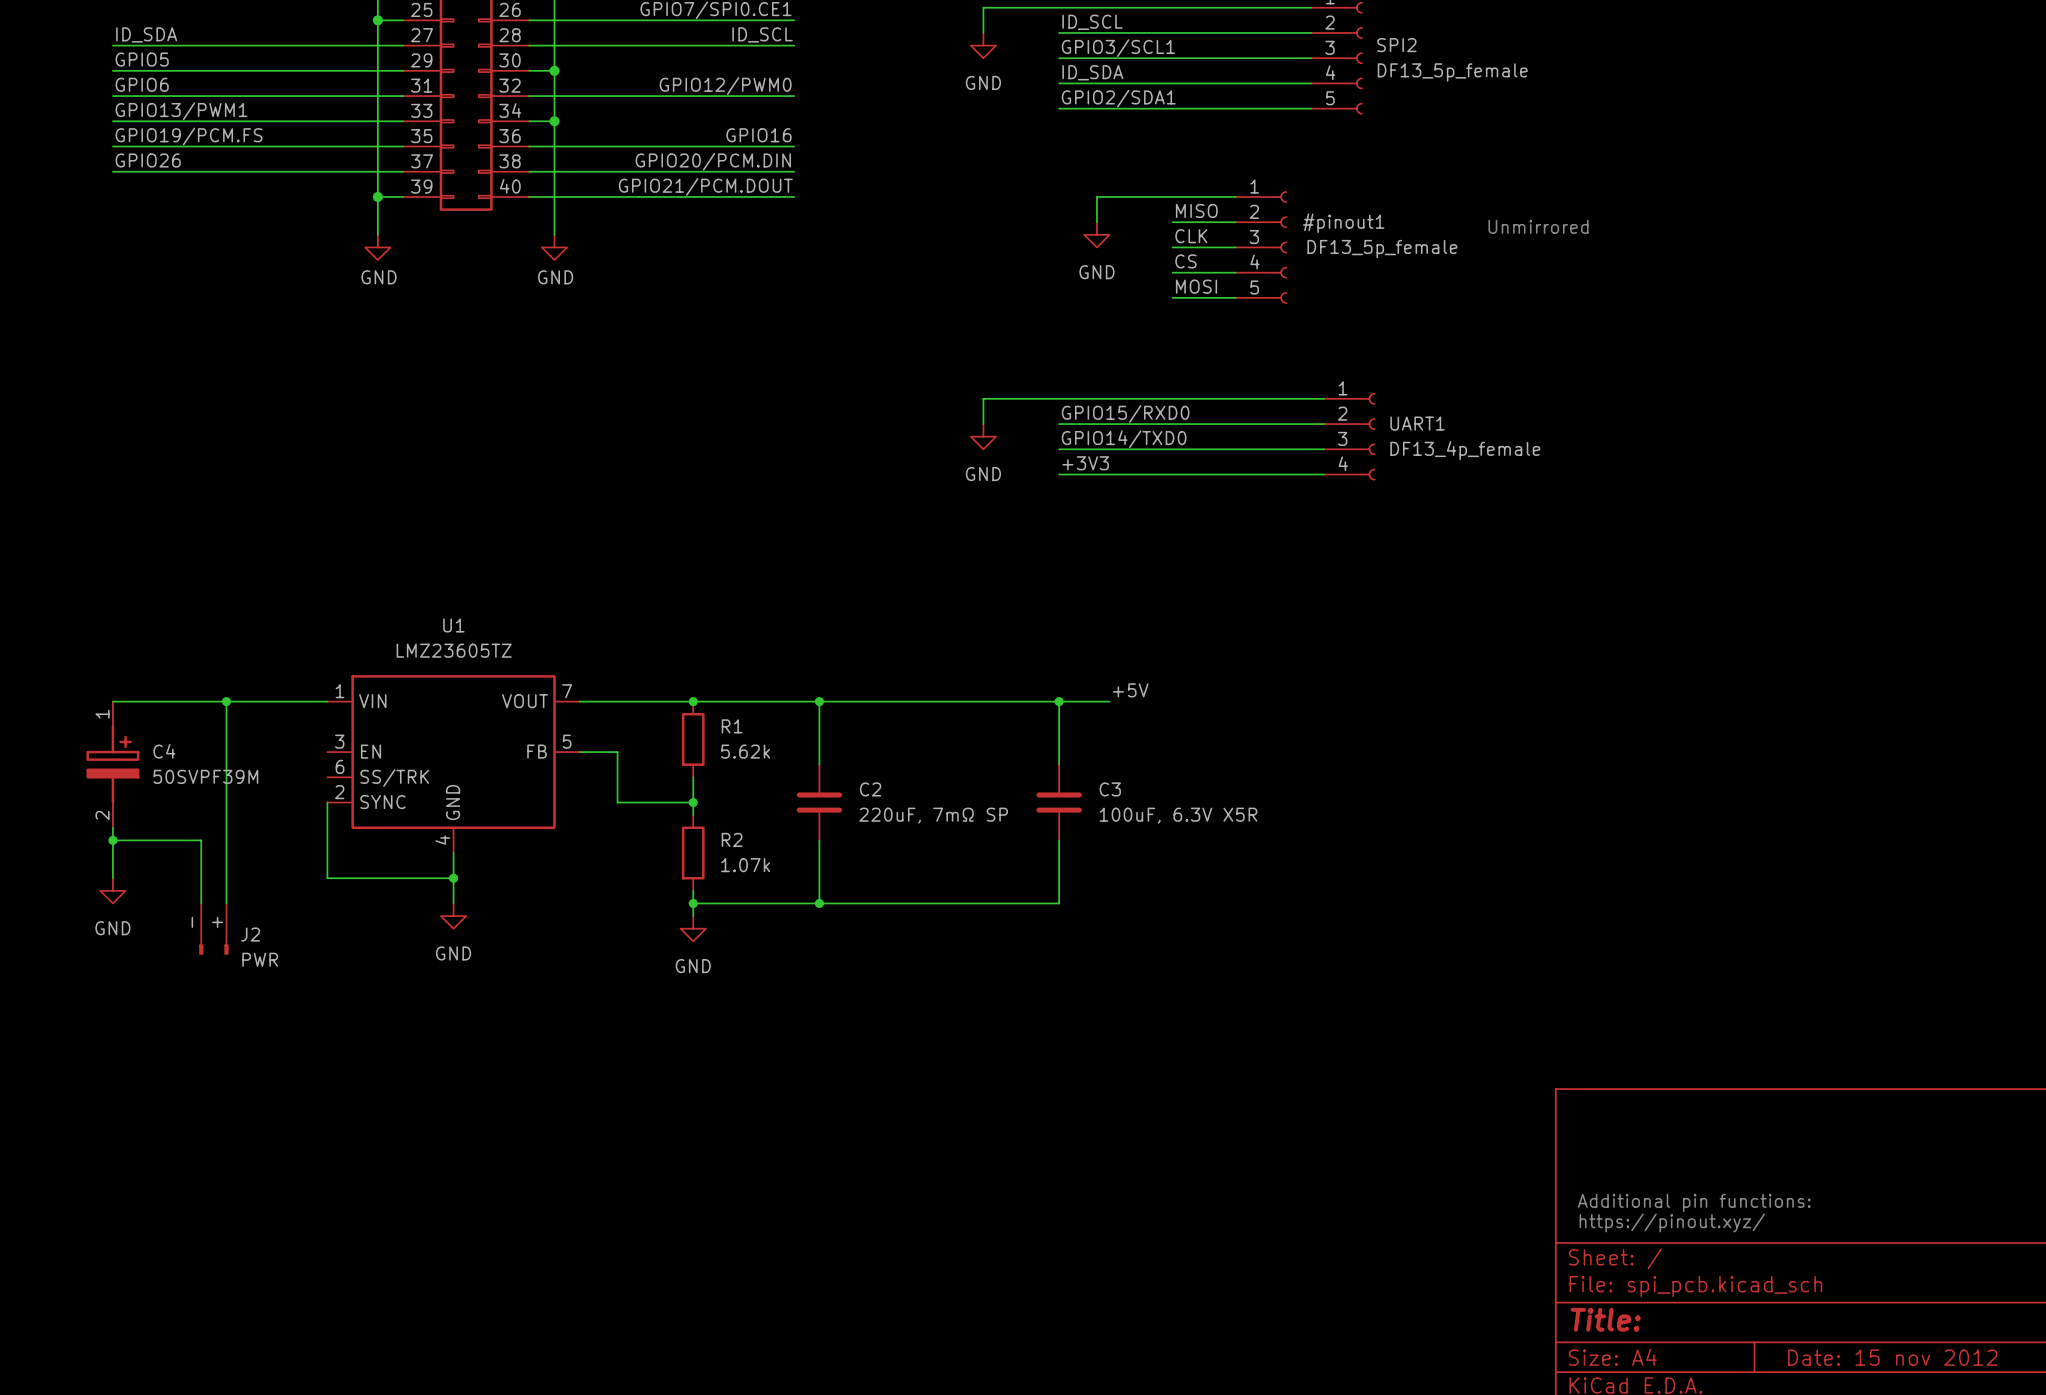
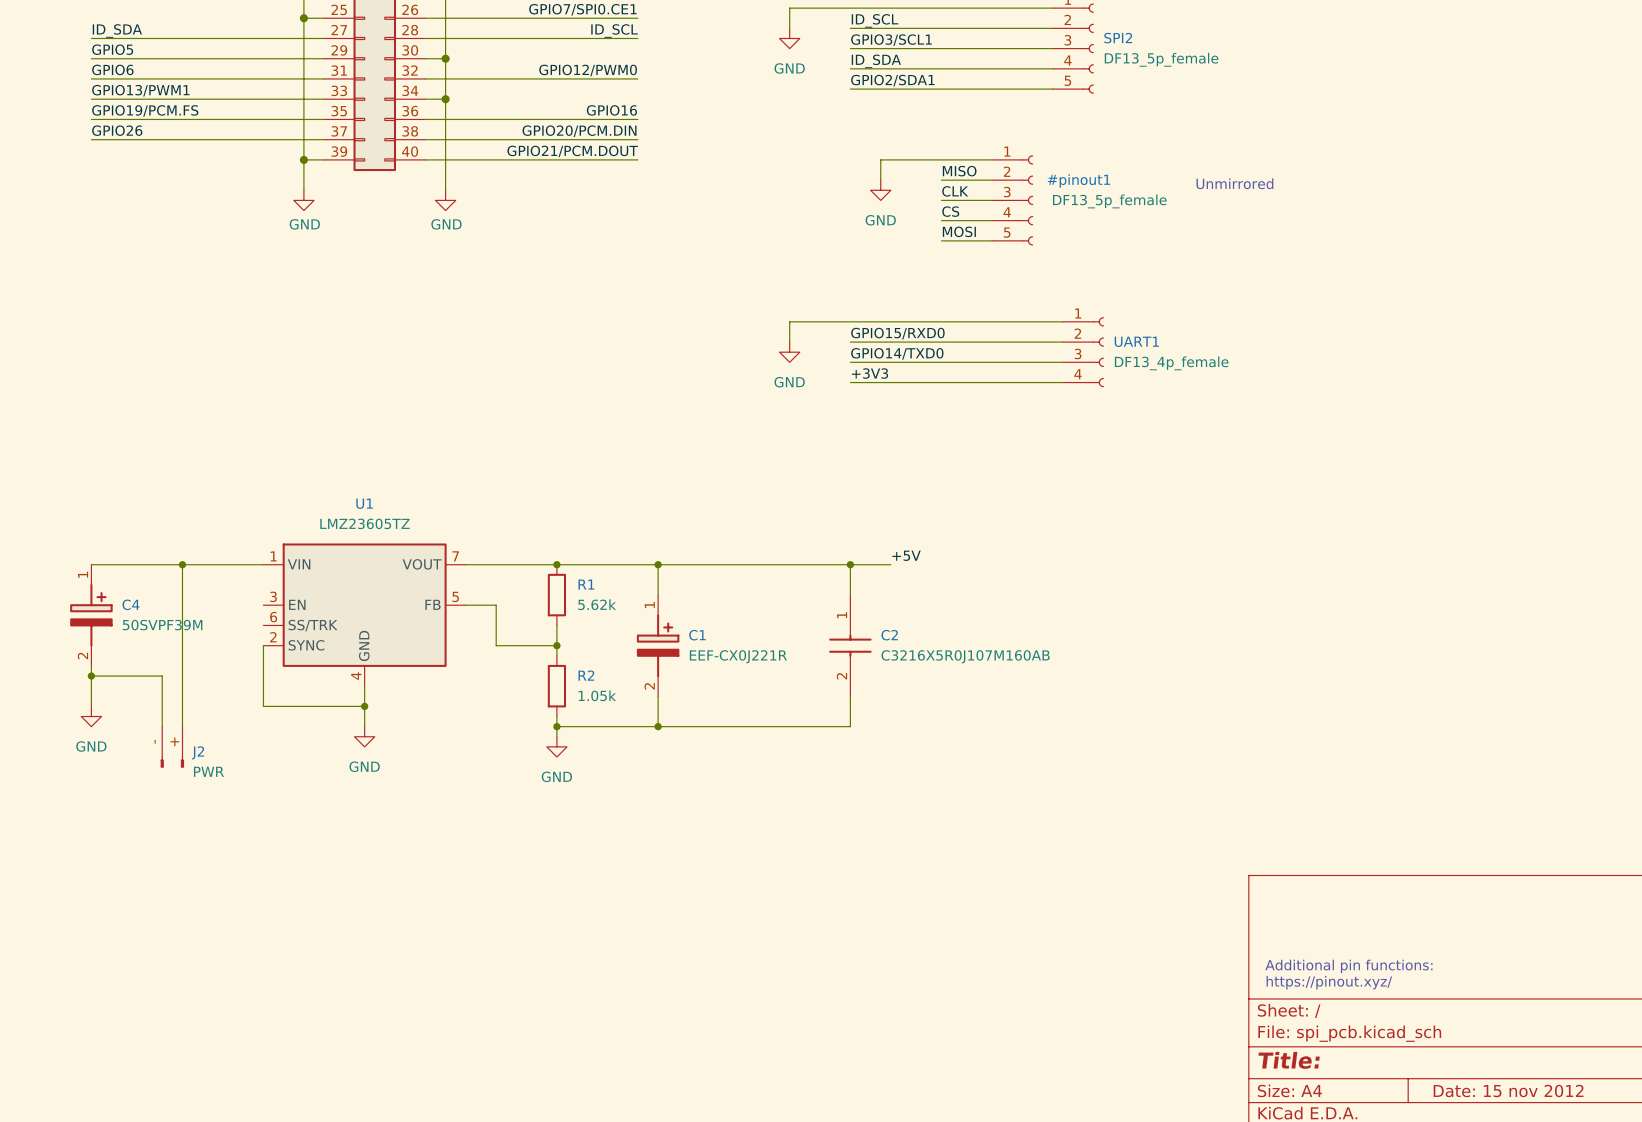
C2 symbol: [796, 764, 843, 841] -> [829, 595, 872, 697]
C1: none -> EEF-CX0J221R (658, 645)
C3: 100uF, 6.3V X5R (1059, 802) -> none
C2 value: 220uF, 7mΩ SP (933, 815) -> C3216X5R0J107M160AB (965, 656)
R2 value: 1.07k (745, 865) -> 1.05k (597, 695)

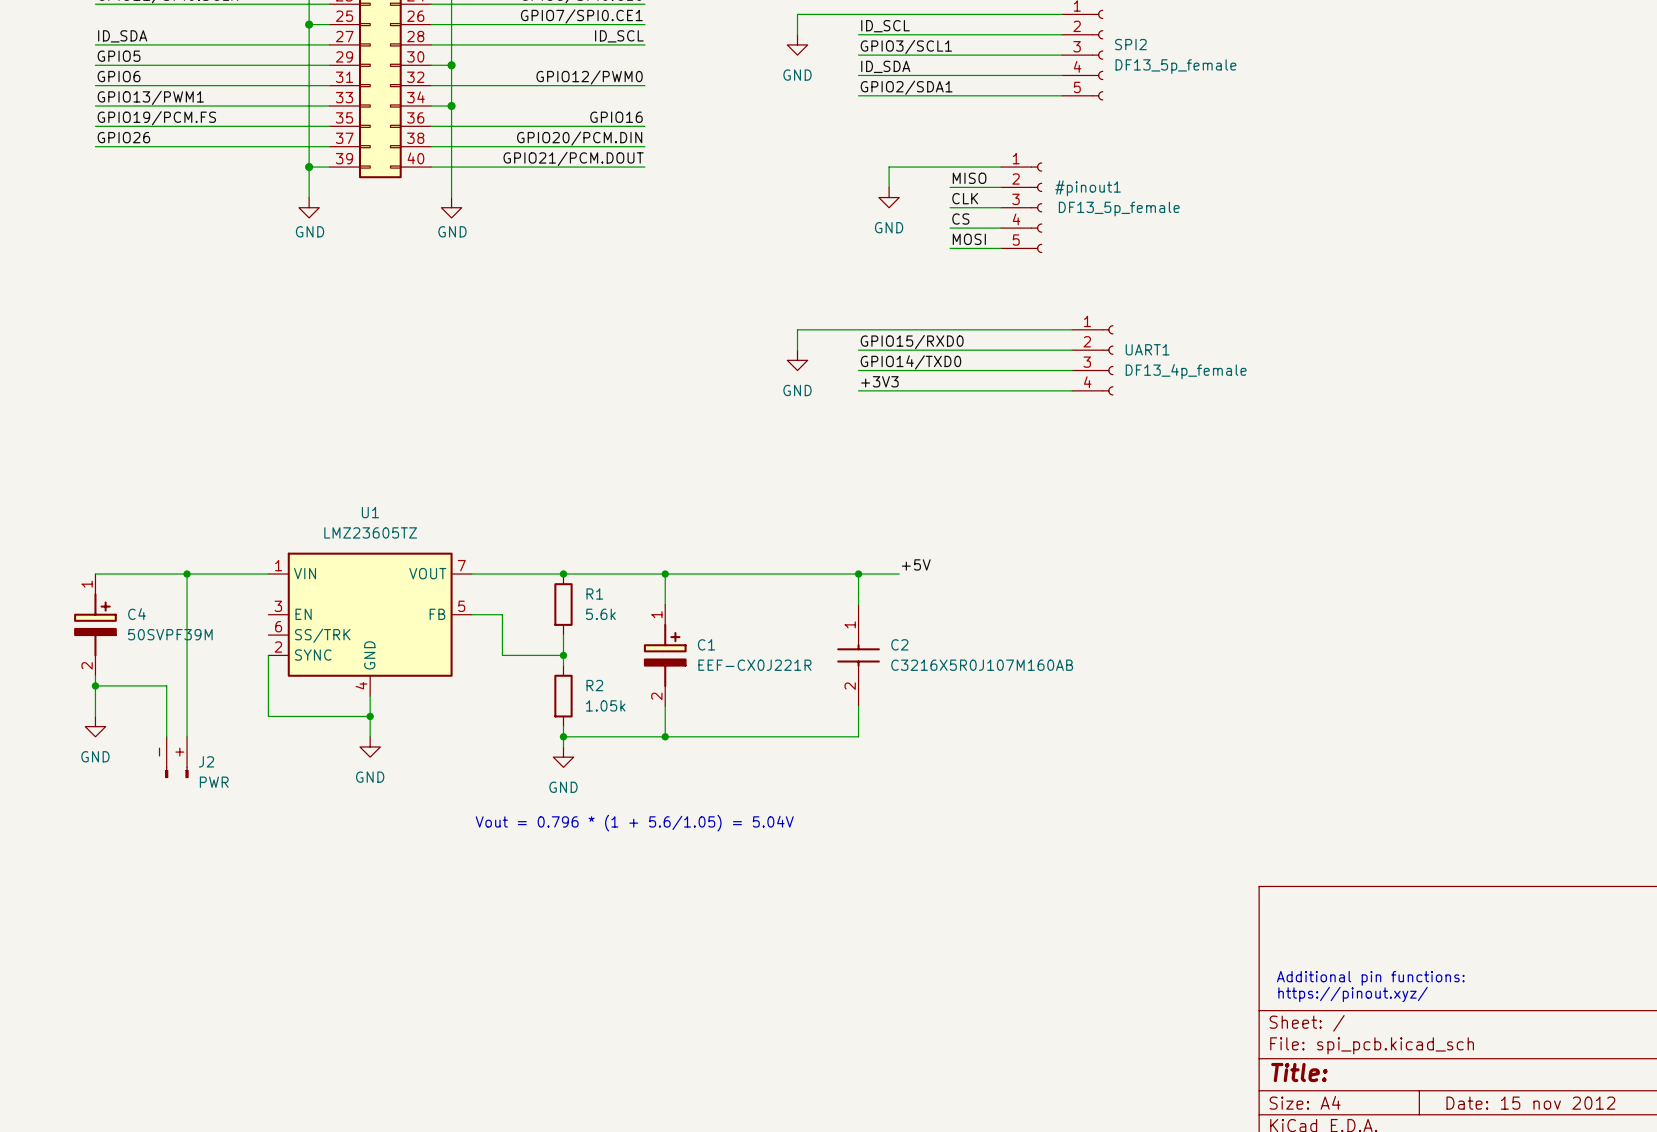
text: Unmirrored (1234, 183) -> none
R1 value: 5.62k (597, 604) -> 5.6k (600, 614)
text: none -> Vout = 0.796 * (1 + 5.6/1.05) = 5.04V (634, 823)

